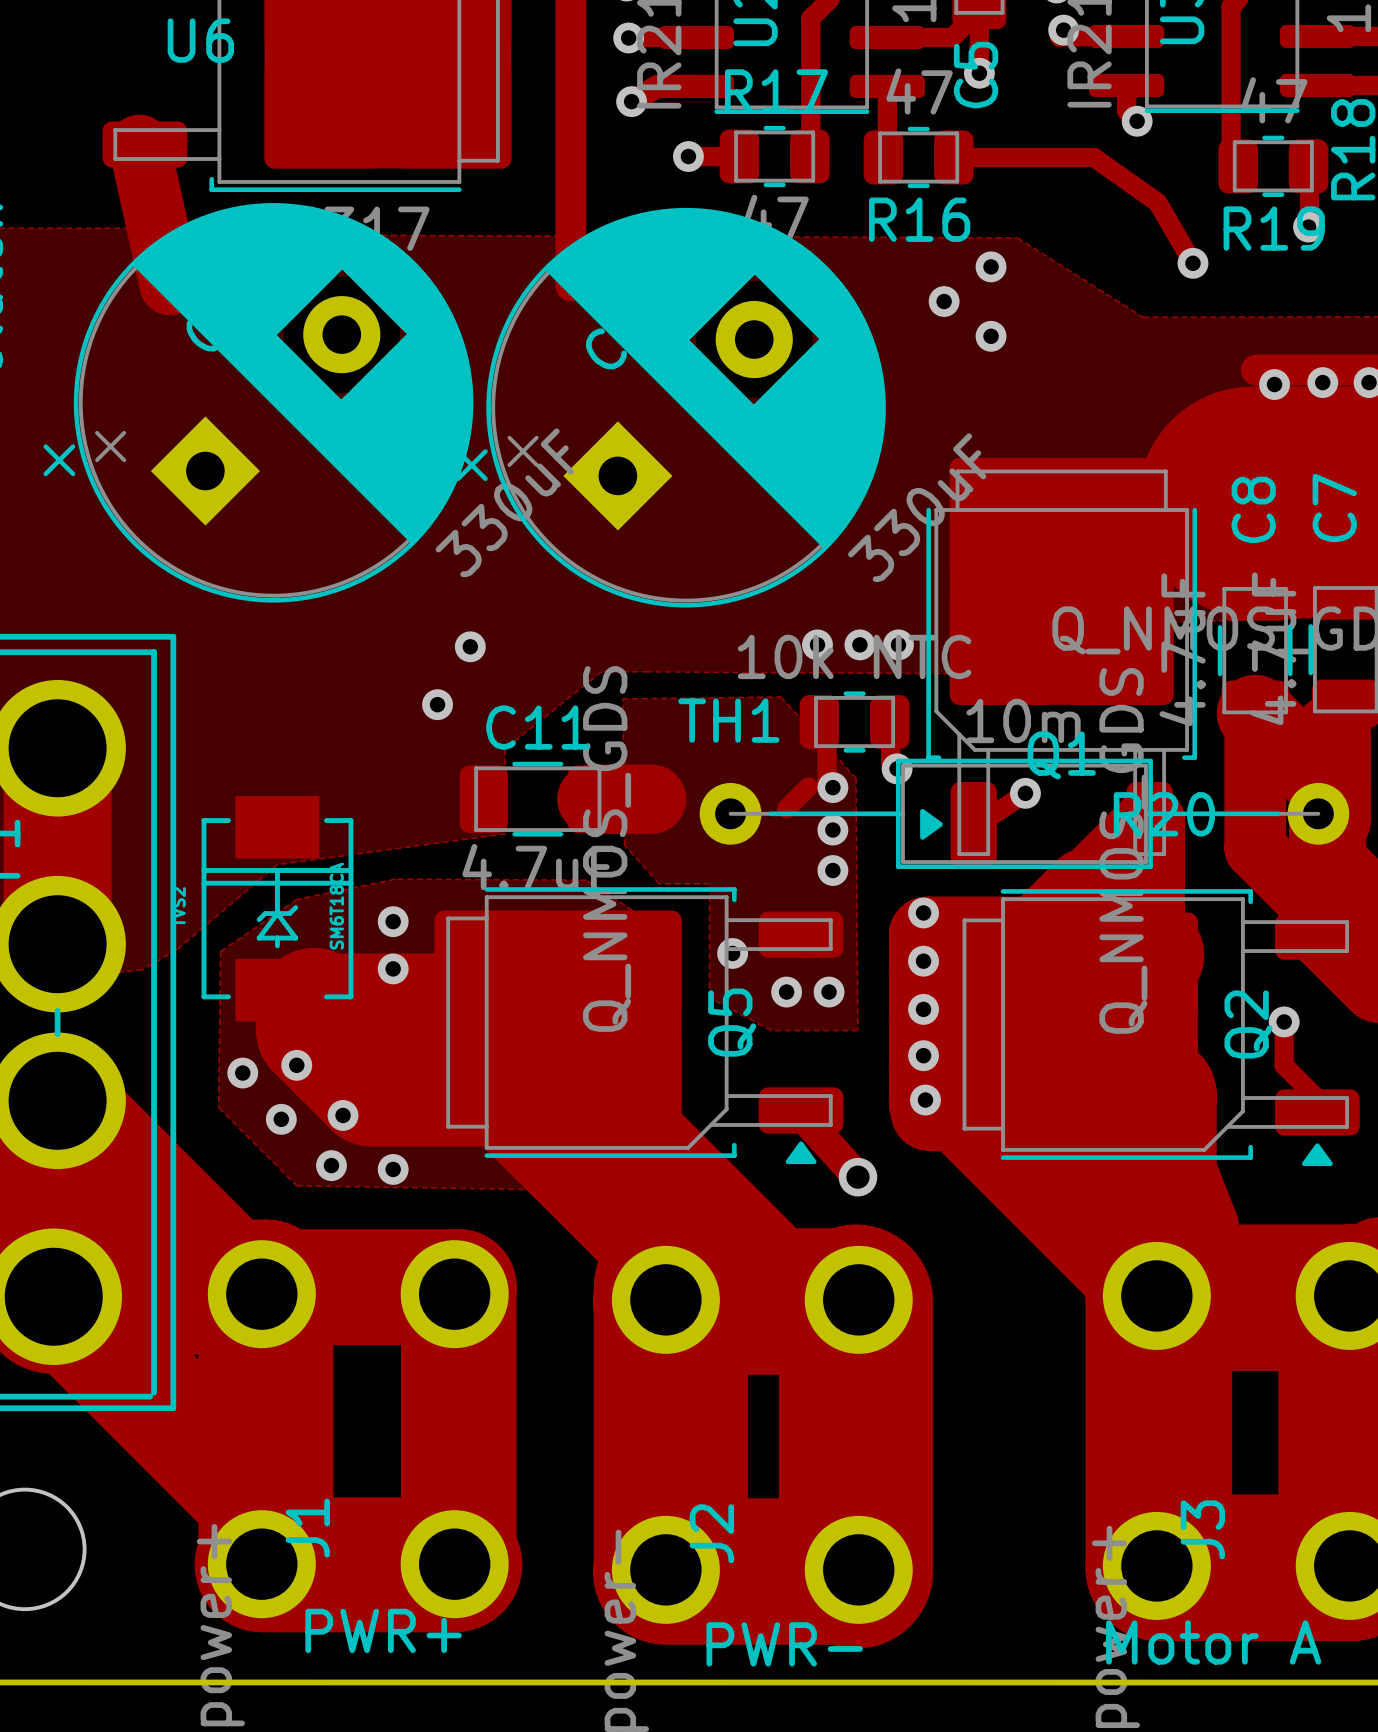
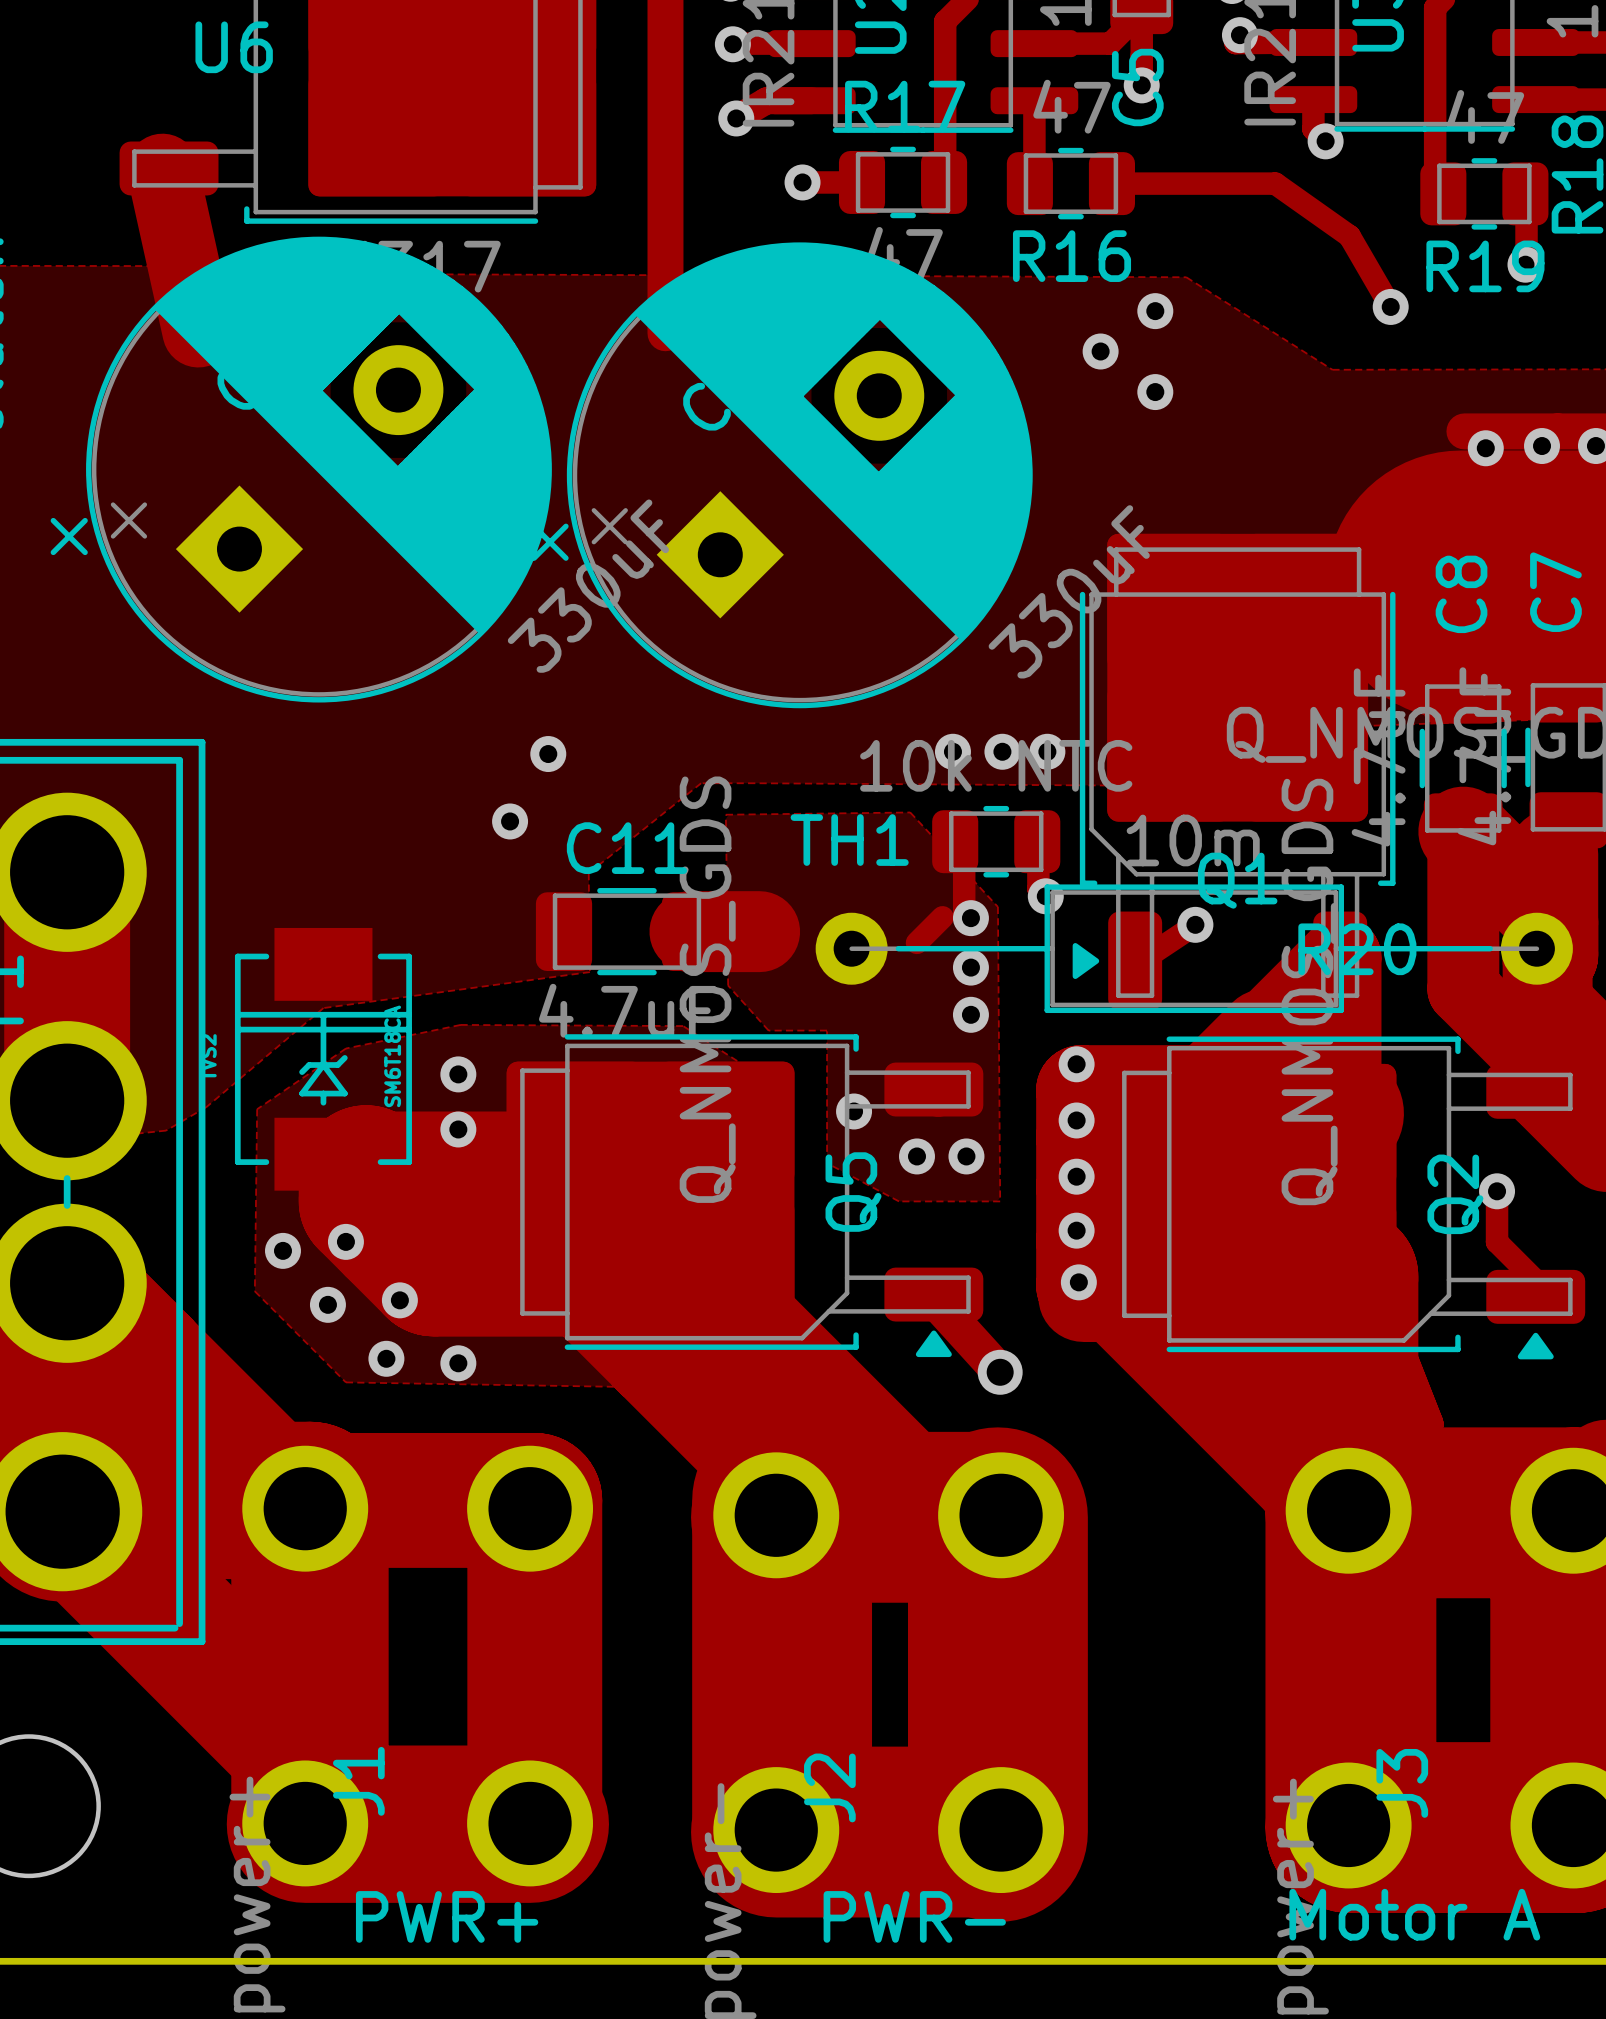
text position: PWR+ (383, 1630) -> PWR+ (447, 1916)

